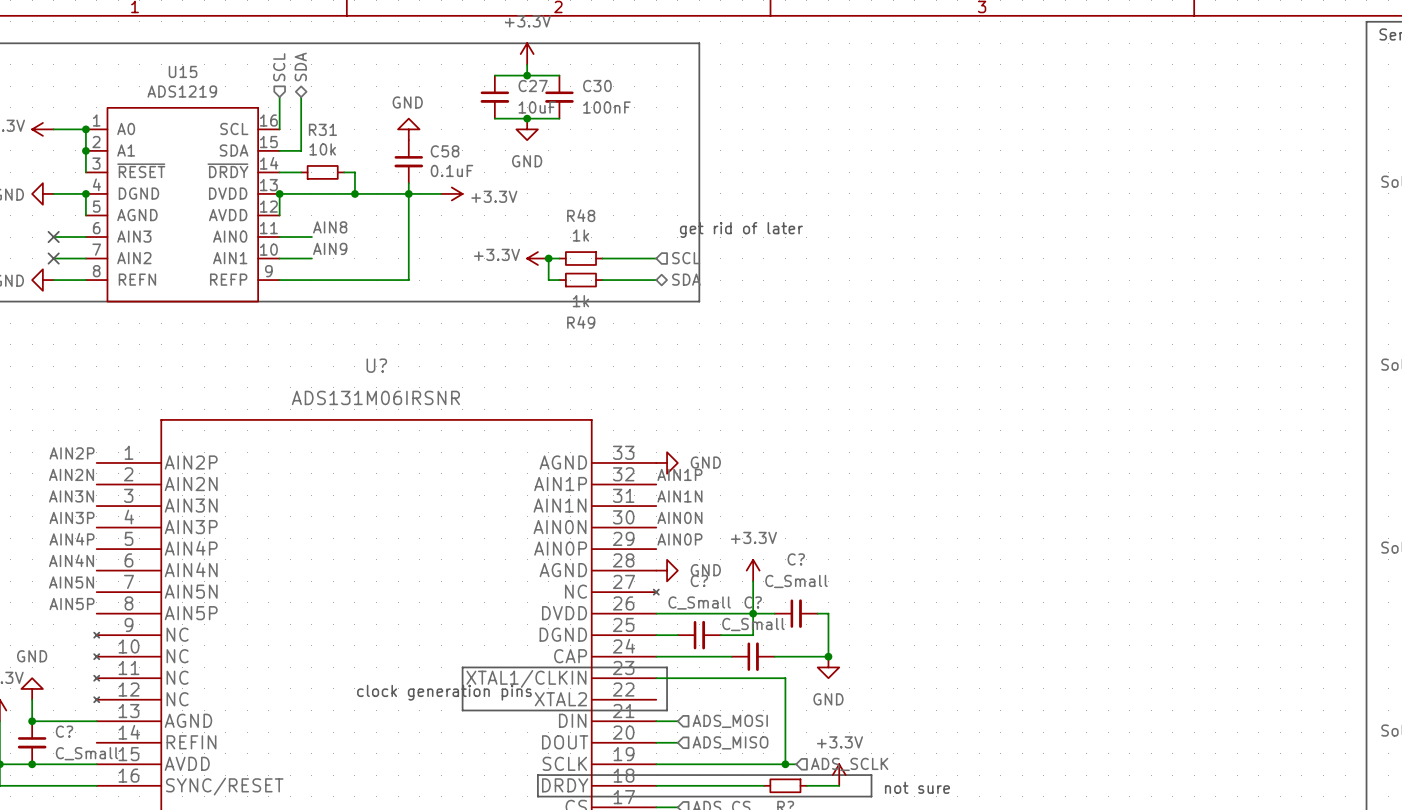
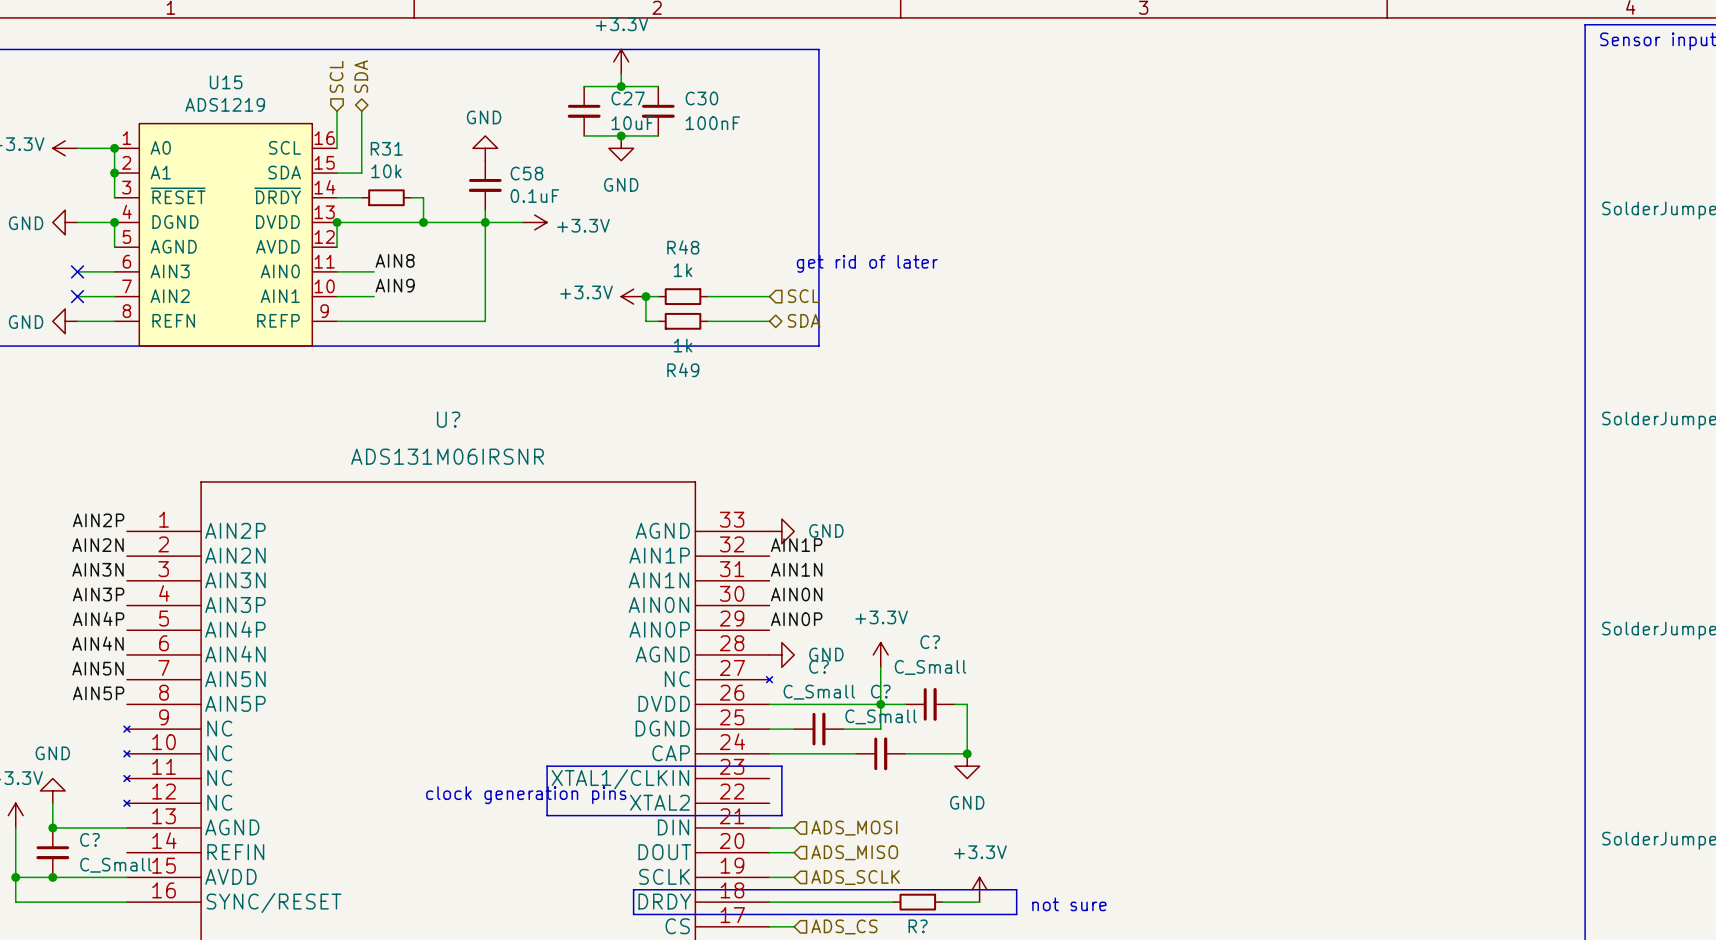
wire: (656, 678) (785, 678) (785, 764) -> none
wire: (677, 764) (796, 764) -> none
junction: (785, 764) -> none
hierarchical label position: ADS_SCLK (849, 764) -> ADS_SCLK (855, 877)

